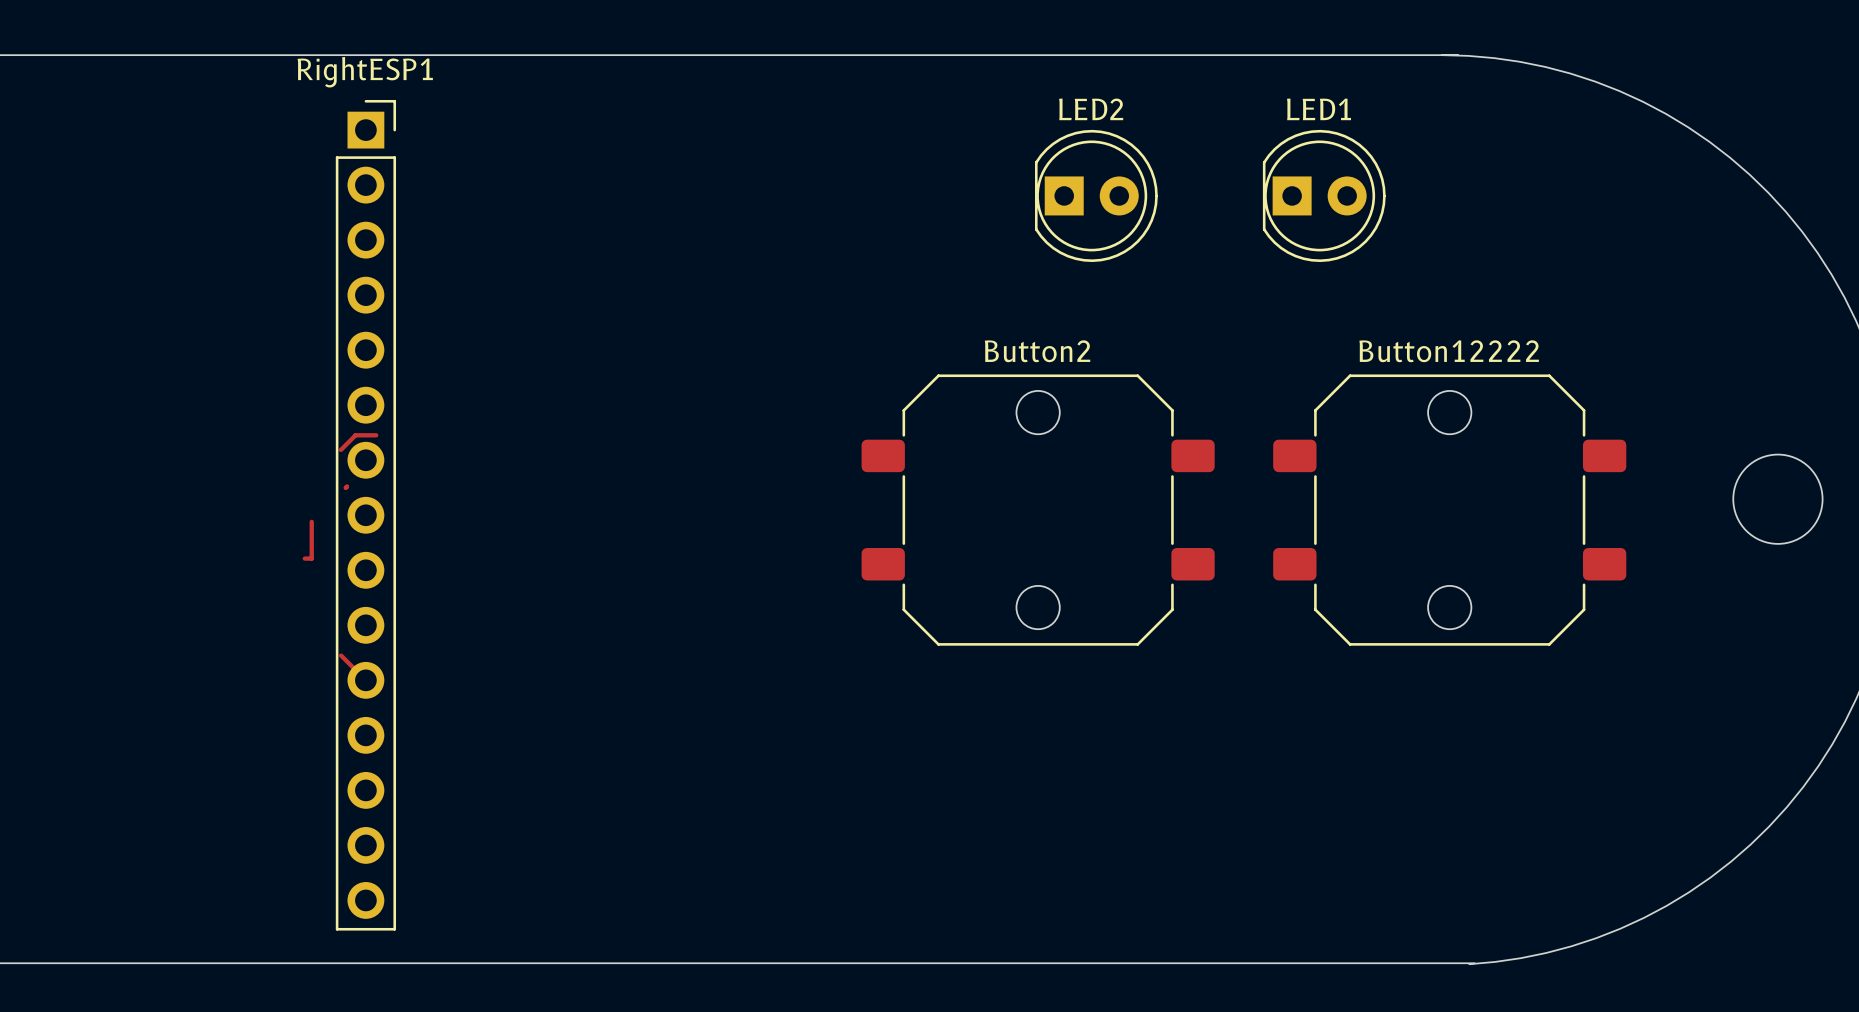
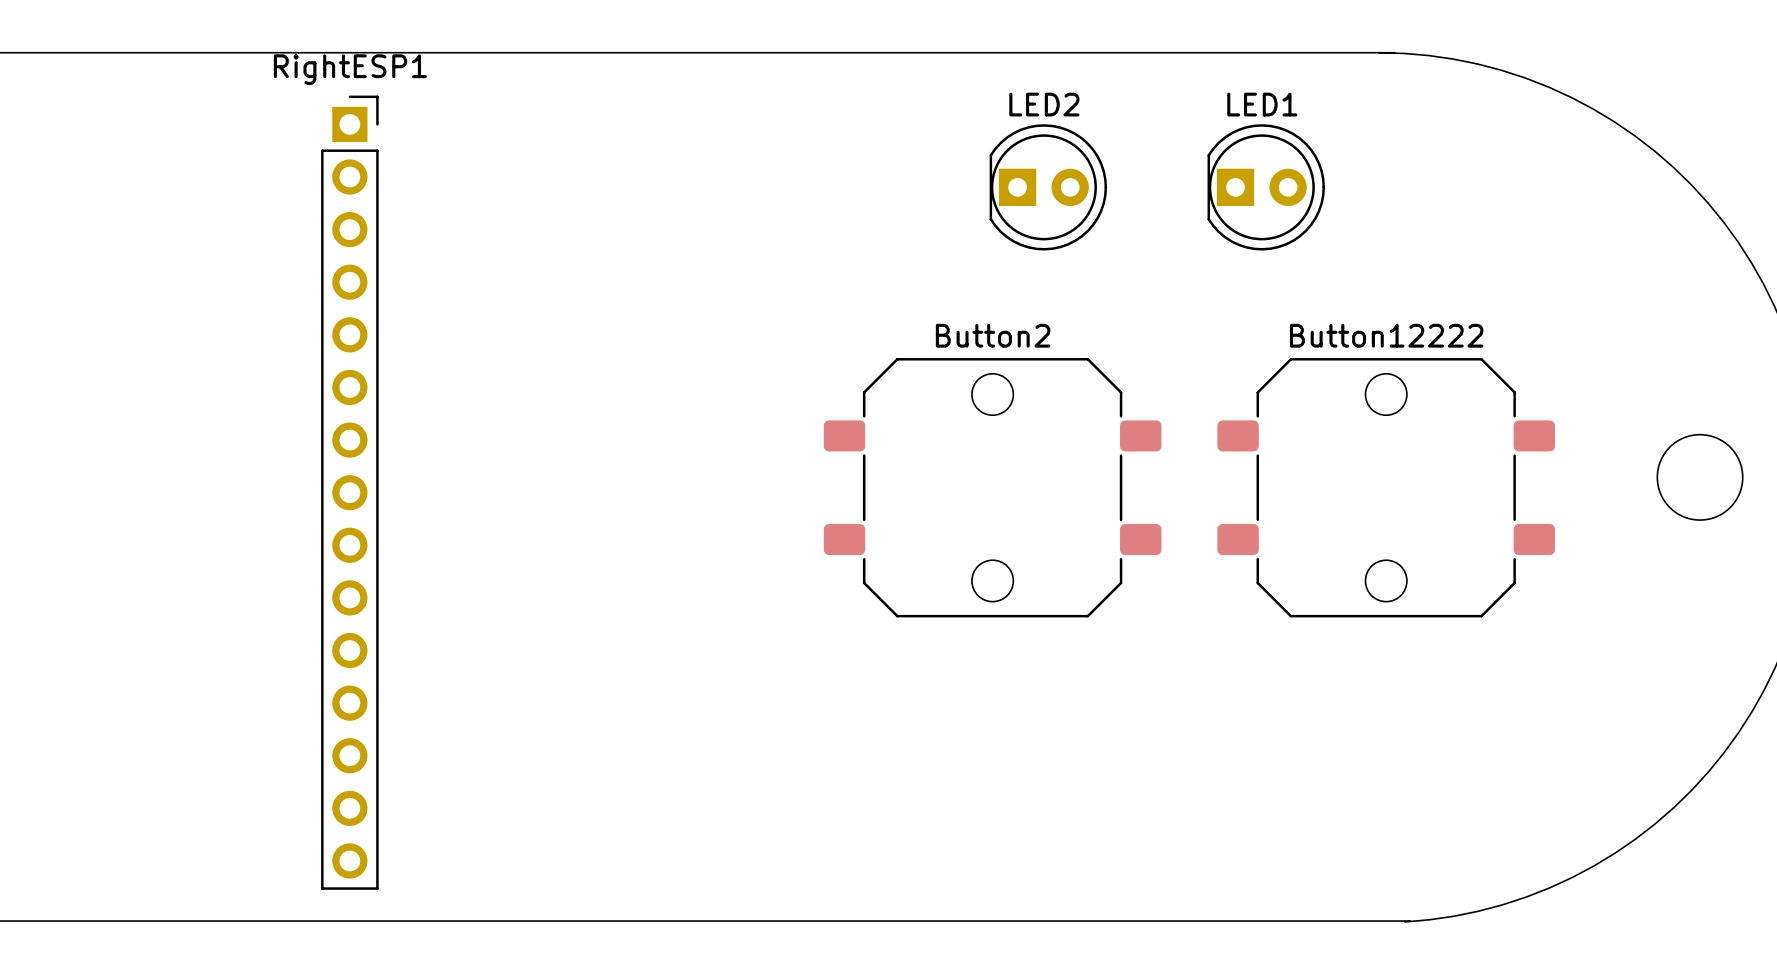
top track: (376, 435) (355, 435) (340, 449) -> none
top track: (346, 486) (345, 487) -> none
top track: (311, 521) (311, 558) (304, 558) -> none
top track: (341, 655) (365, 680) -> none

